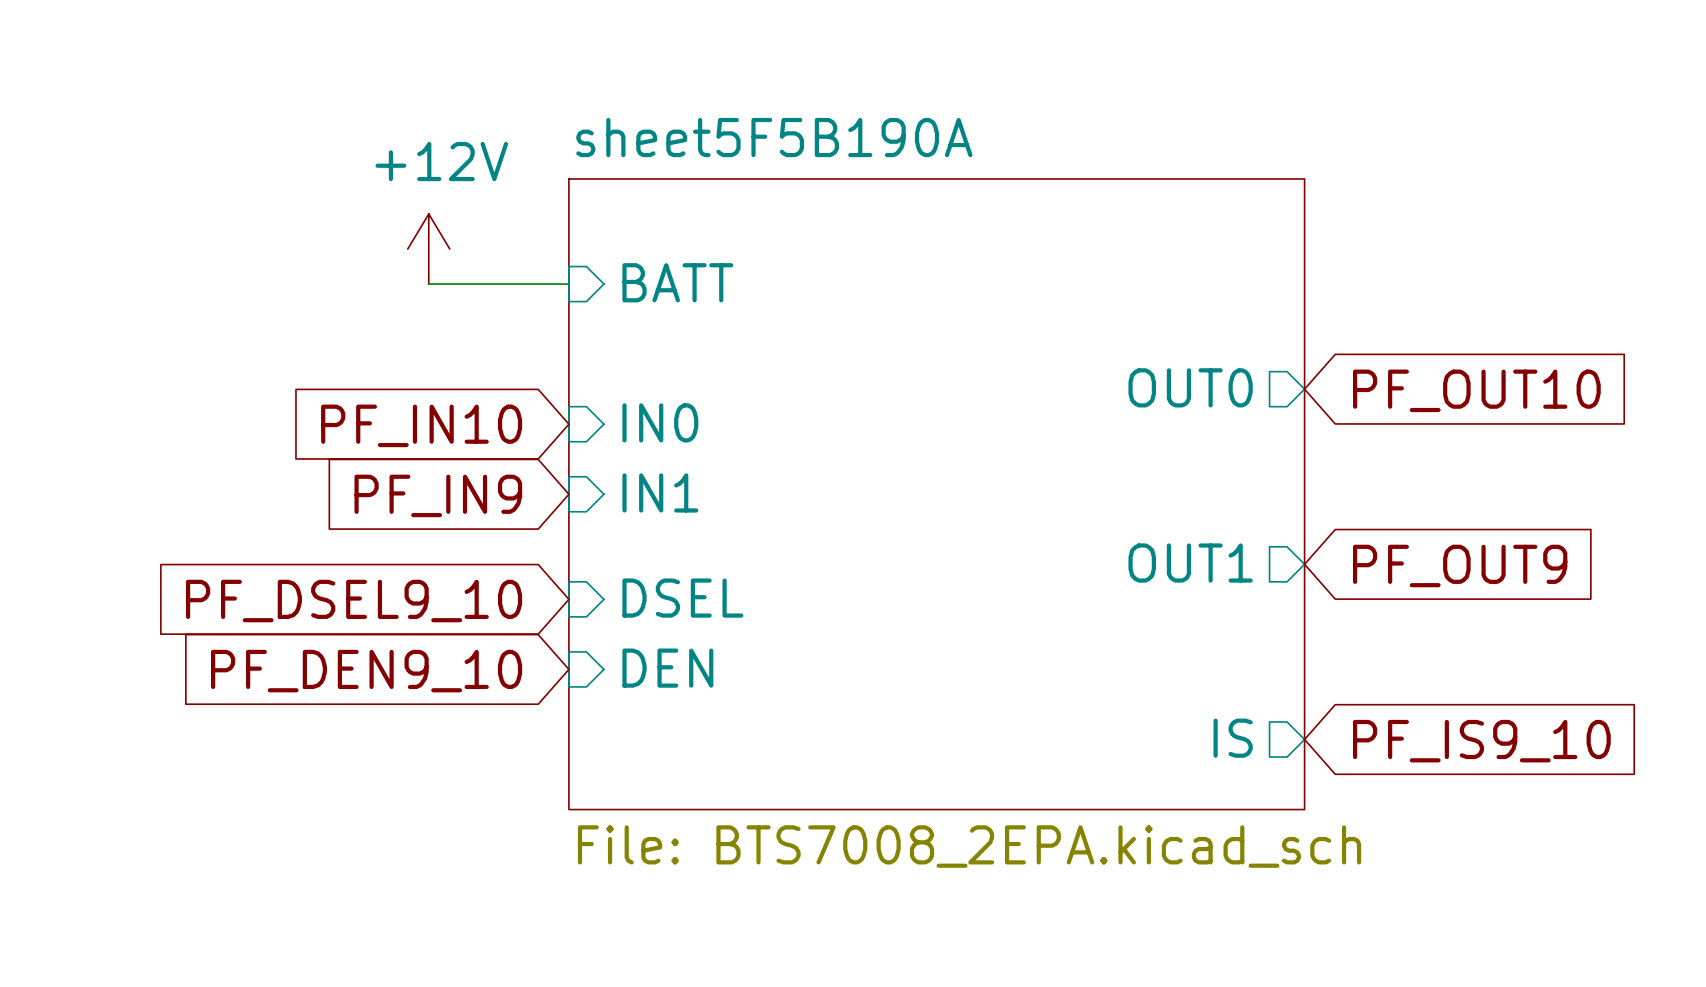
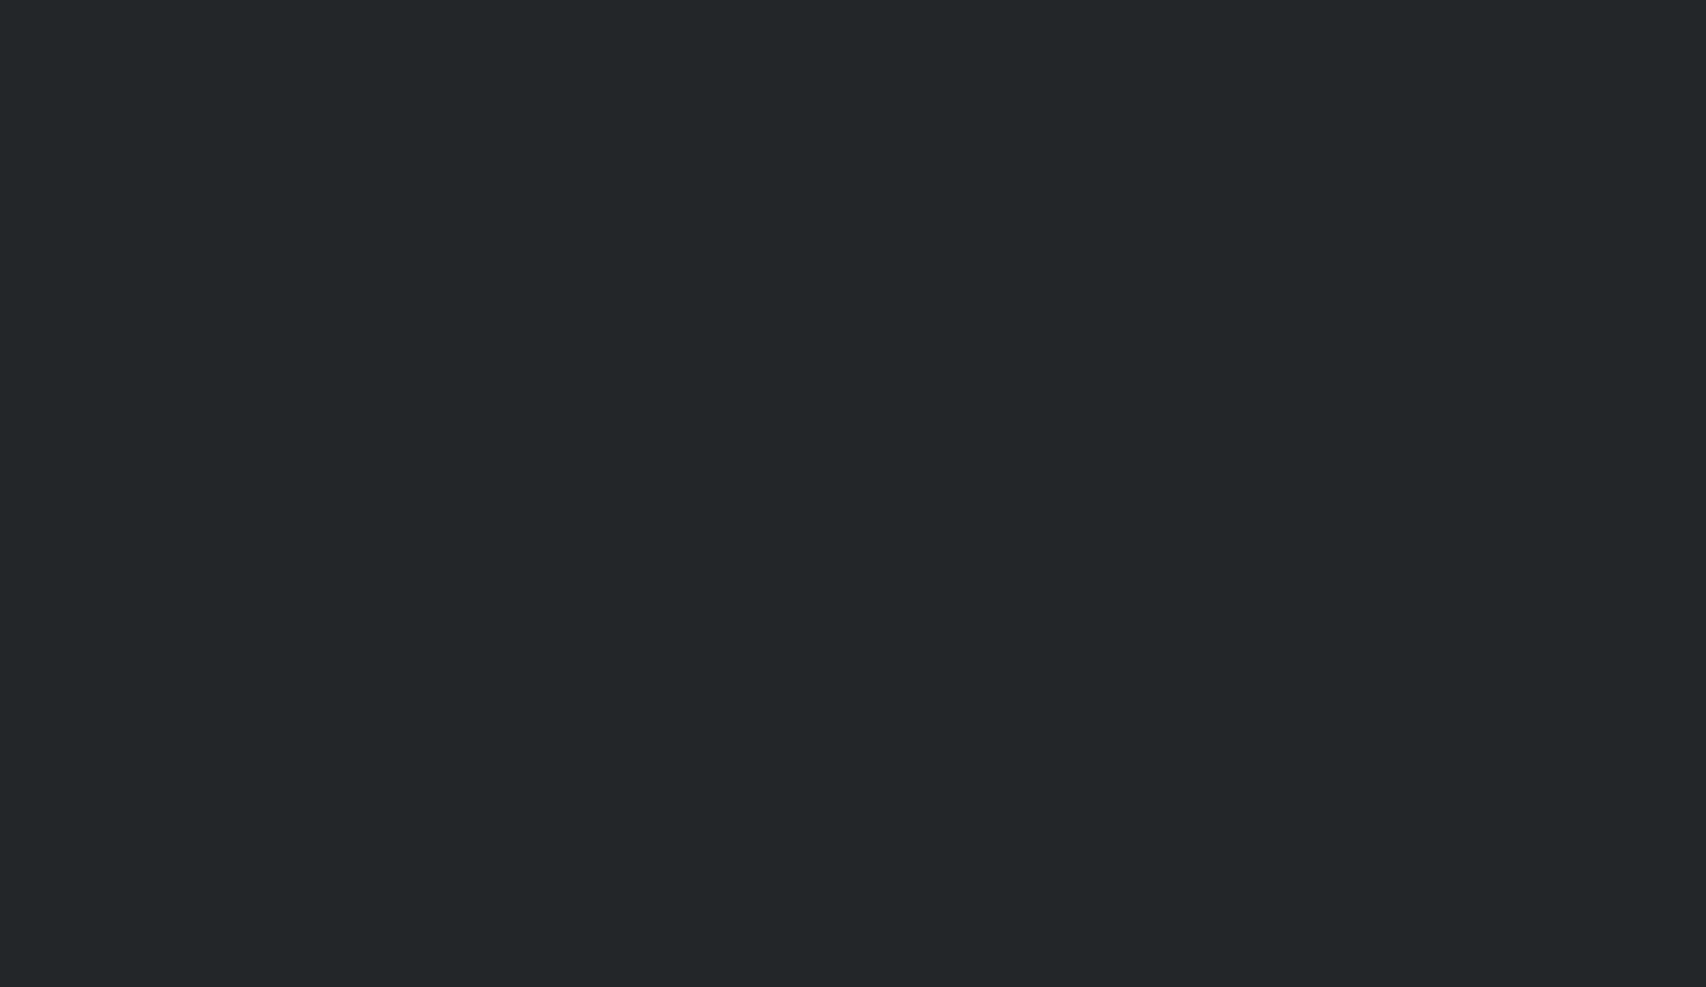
power symbol: +12V (428, 249) -> none
sheet pin: BATT (677, 282) -> none
wire: (428, 284) (568, 284) -> none
sheet pin: OUT0 (1190, 387) -> none
global label: PF_OUT10 (1476, 390) -> none
sheet pin: IN0 (660, 422) -> none
global label: PF_IN10 (421, 425) -> none
sheet pin: IN1 (660, 492) -> none
sheet sheet5F5B190A: File: BTS7008_2EPA.kicad_sch (936, 494) -> none
global label: PF_IN9 (438, 495) -> none
sheet pin: OUT1 (1190, 563) -> none
global label: PF_OUT9 (1460, 566) -> none
sheet pin: DSEL (682, 598) -> none
global label: PF_DSEL9_10 (354, 601) -> none
sheet pin: DEN (667, 668) -> none
global label: PF_DEN9_10 (366, 671) -> none
sheet pin: IS (1233, 738) -> none
global label: PF_IS9_10 (1481, 741) -> none

